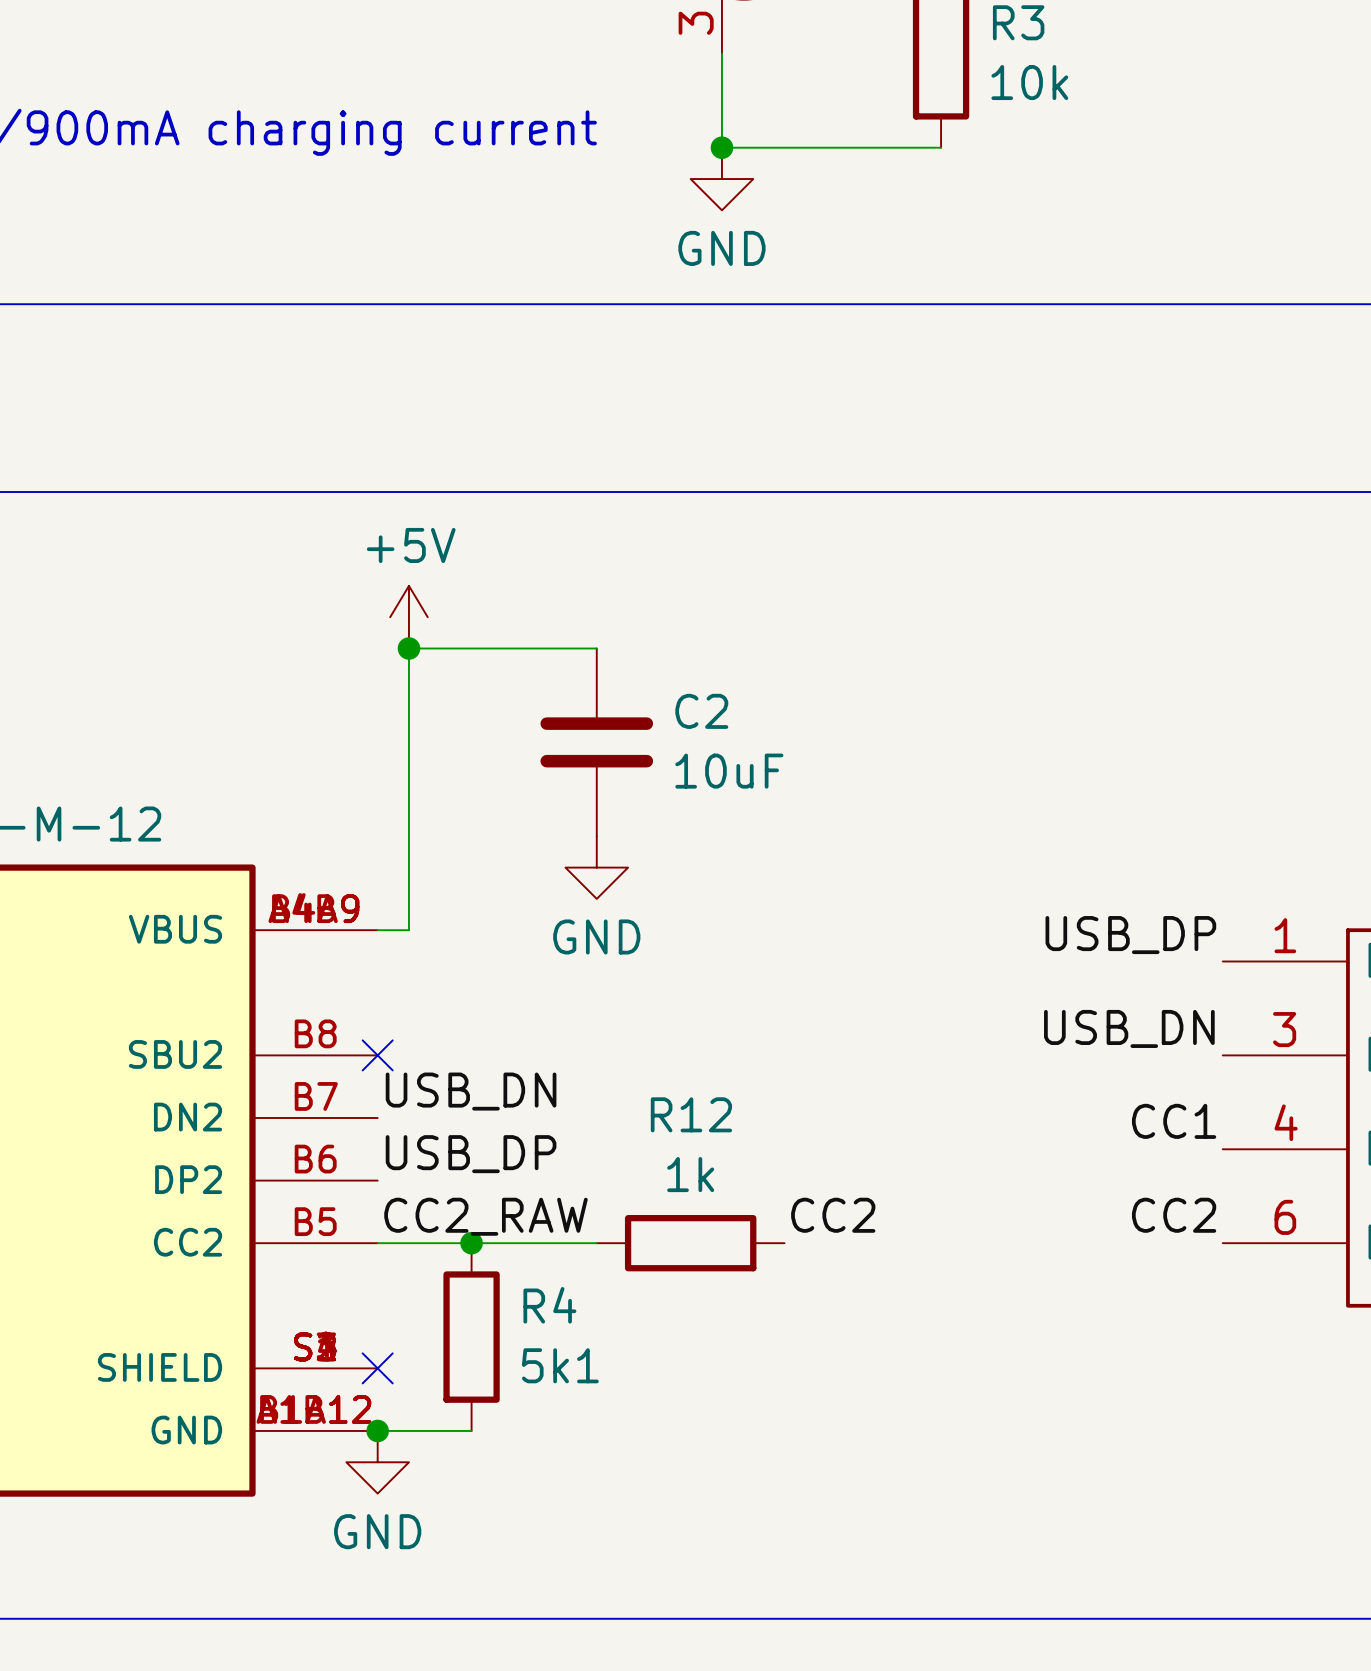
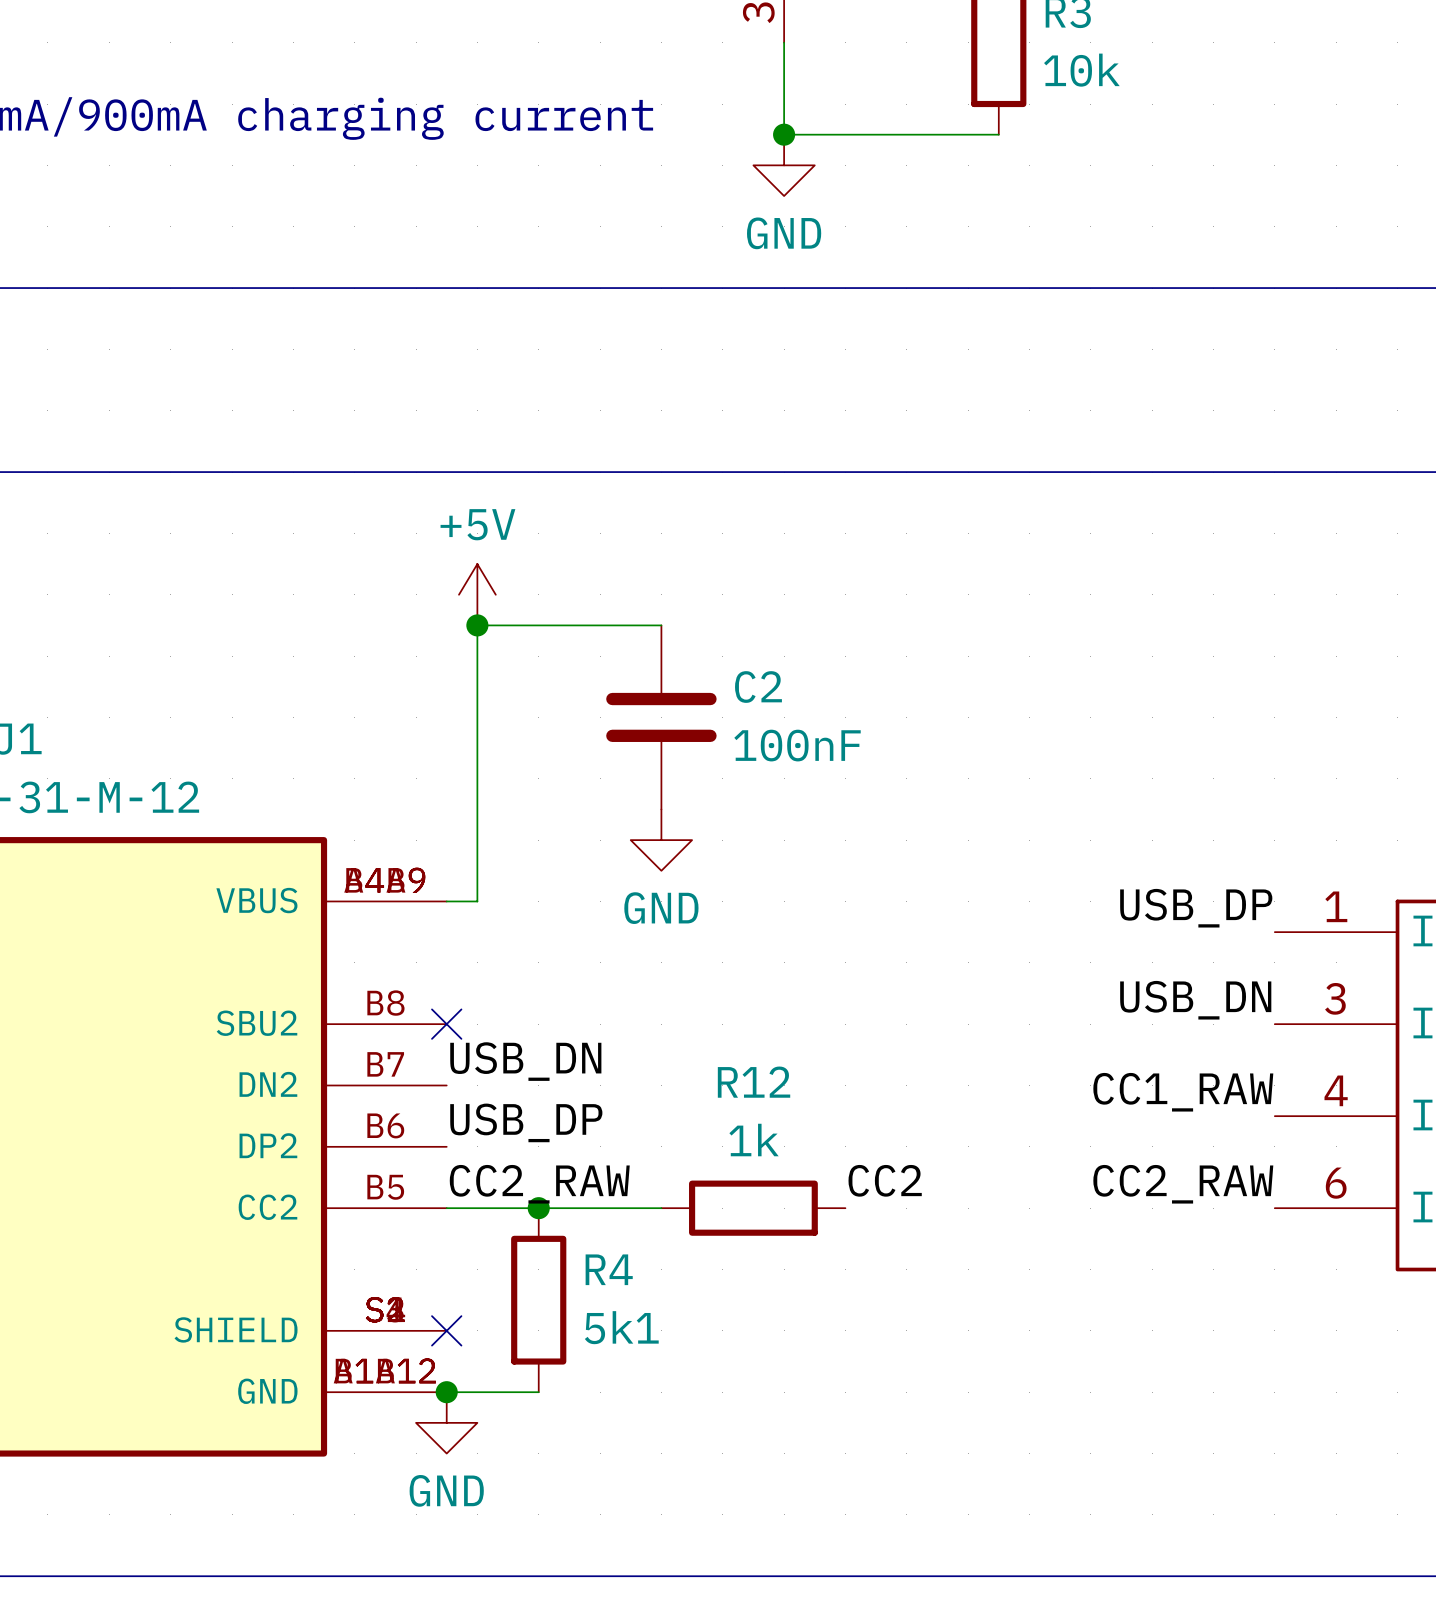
C2 value: 10uF (729, 771) -> 100nF (797, 745)
label: CC1 (1174, 1121) -> CC1_RAW (1183, 1092)
label: CC2 (1174, 1215) -> CC2_RAW (1183, 1184)

